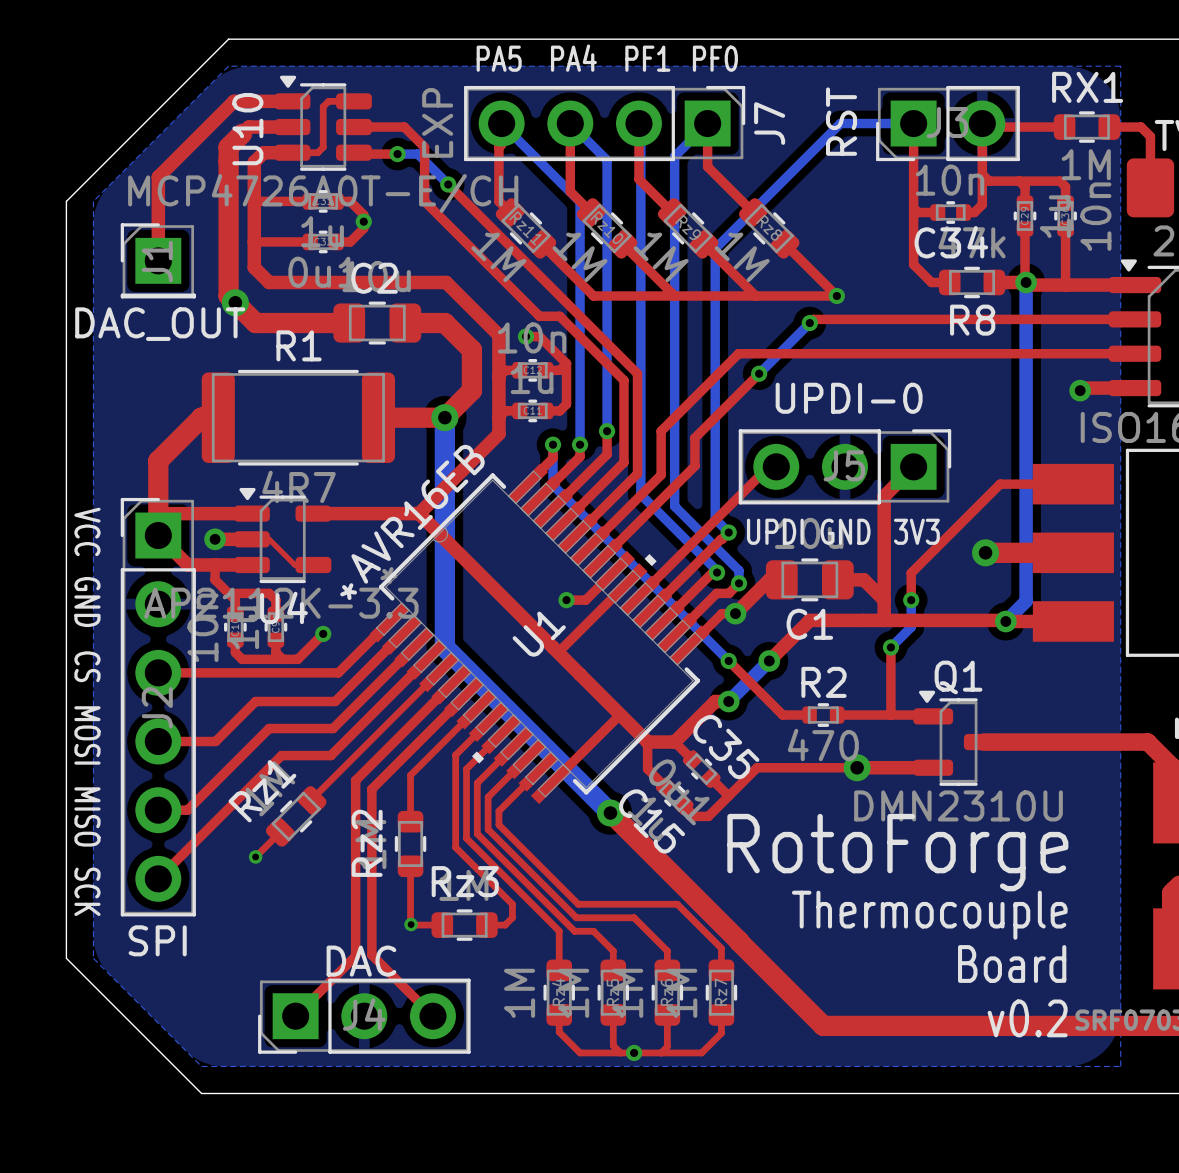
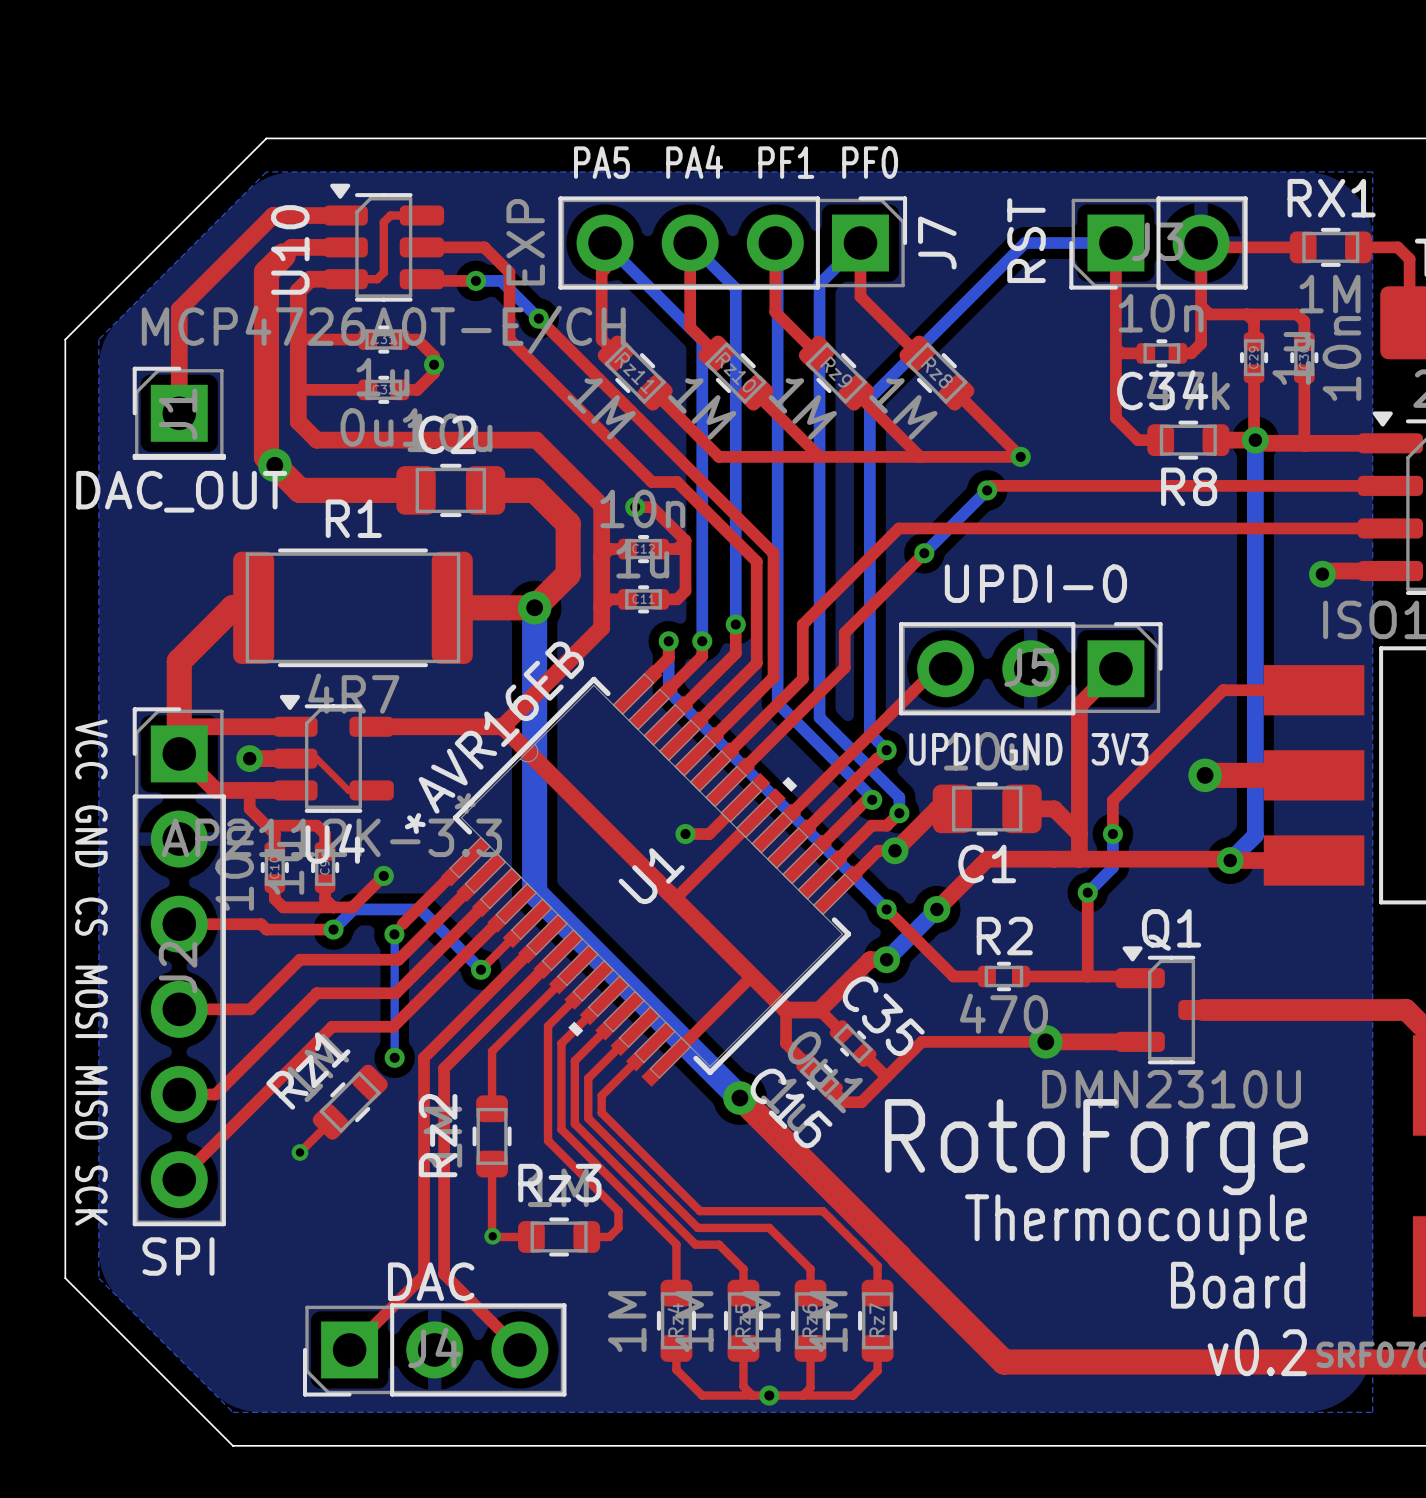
top track: (224, 672) (338, 672) -> (261, 924) (266, 929) (333, 929)
bottom track: none -> (333, 929) (353, 909) (420, 909) (481, 969)
via: none -> (333, 929)
via: none -> (394, 934)
bottom track: none -> (394, 934) (394, 1057)
top track: (401, 709) (311, 799) -> none
via: none -> (481, 969)
via: none -> (394, 1057)

